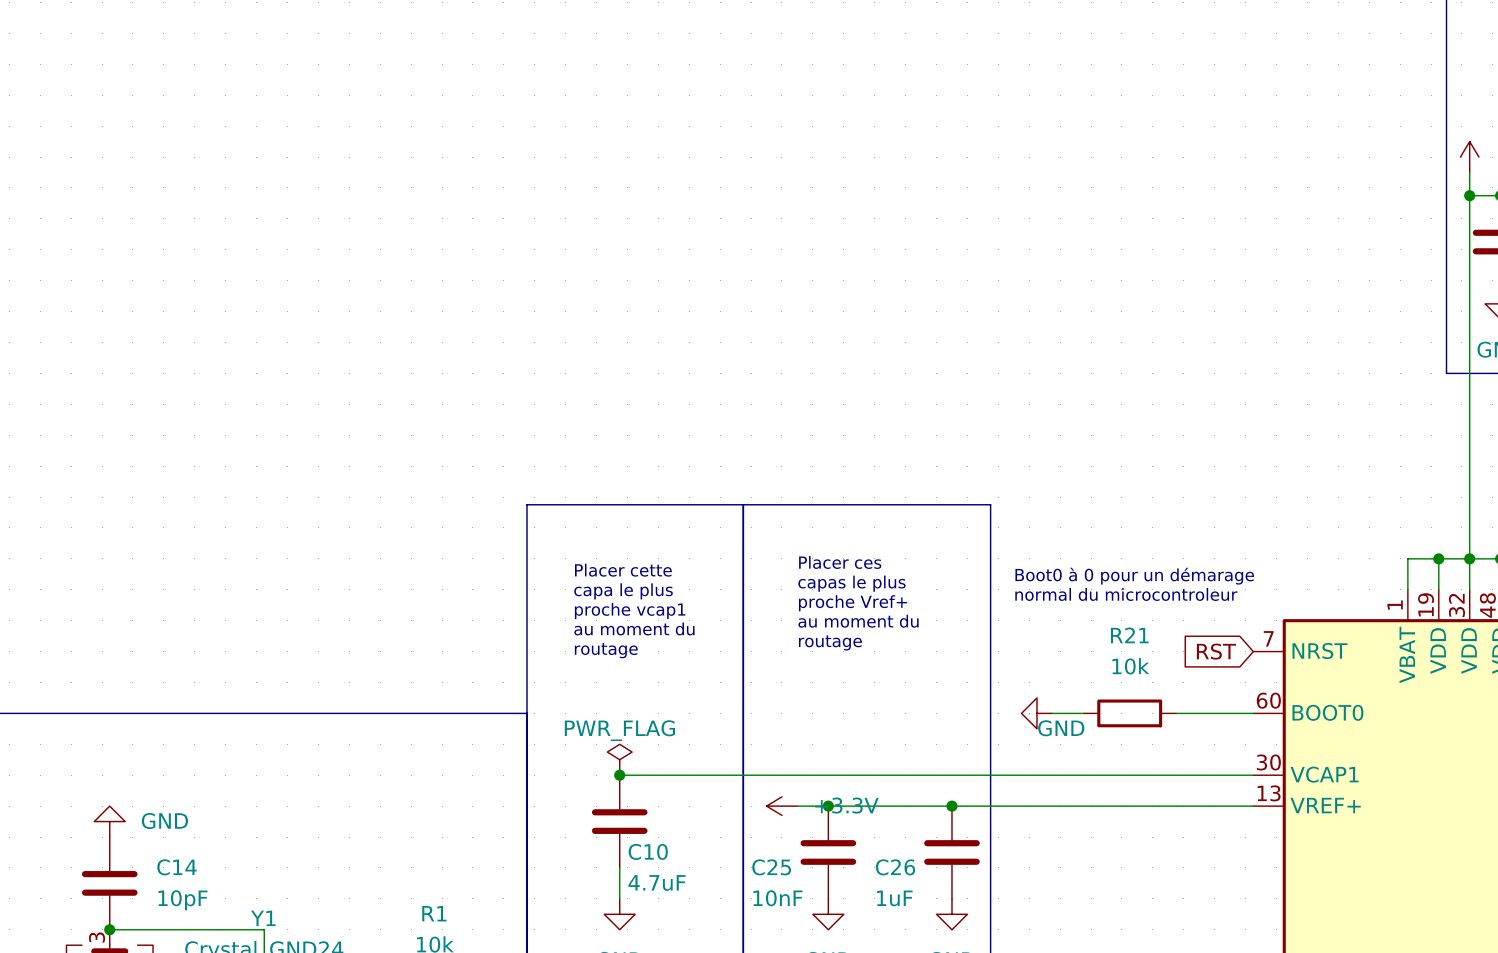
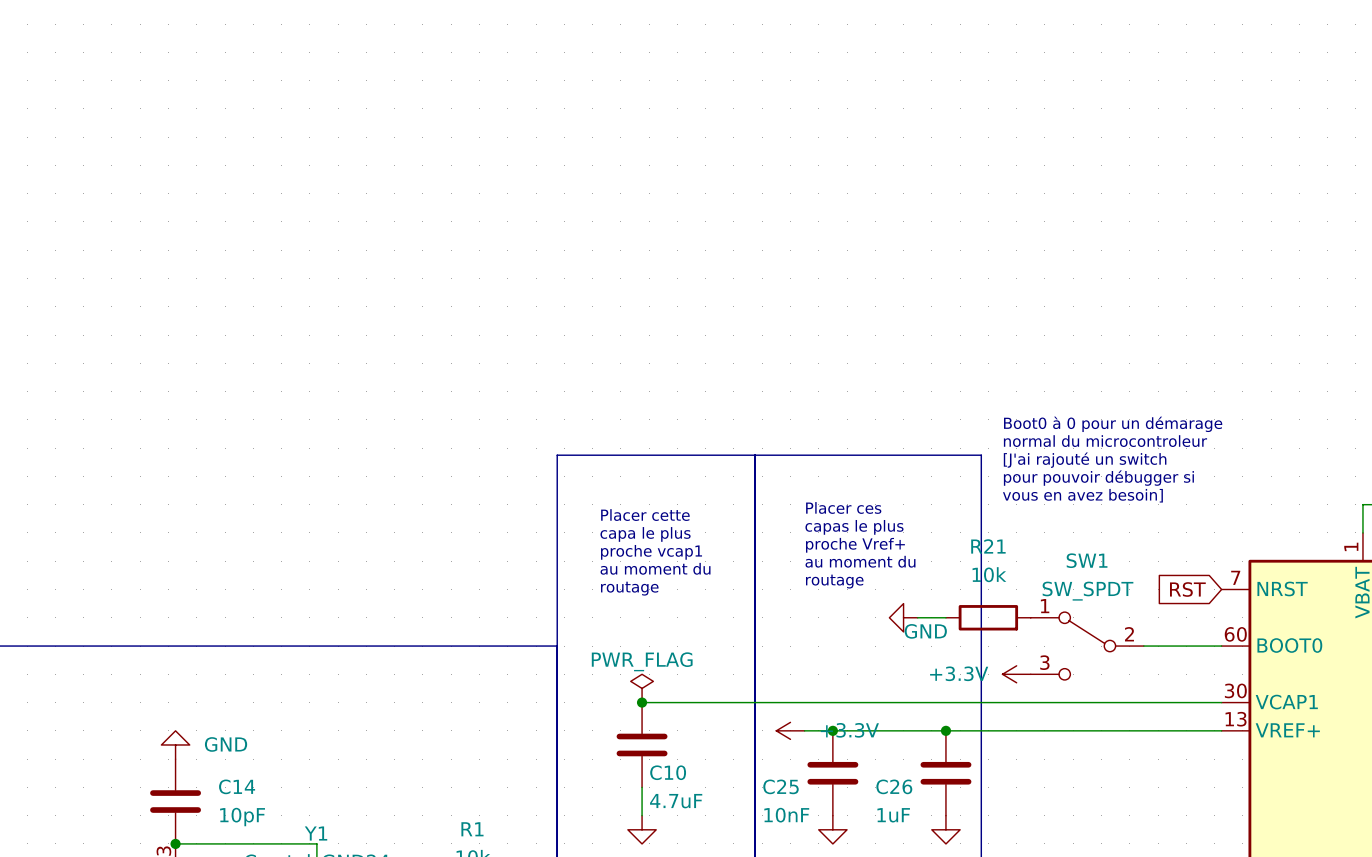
text: none -> [J'ai rajouté un switch (1085, 460)
text: none -> pour pouvoir débugger si (1098, 478)
text: none -> vous en avez besoin] (1082, 495)
text position: Boot0 à 0 pour un démarage (1134, 576) -> Boot0 à 0 pour un démarage (1113, 424)
text position: normal du microcontroleur (1126, 594) -> normal du microcontroleur (1105, 441)
power symbol position: GND (1036, 713) -> GND (903, 617)
wire: (1052, 713) (1083, 713) -> (917, 617) (945, 617)
SW1: none -> SW_SPDT (1087, 646)
R21 position: (1129, 713) -> (988, 617)
power symbol: none -> +3.3V (1016, 674)

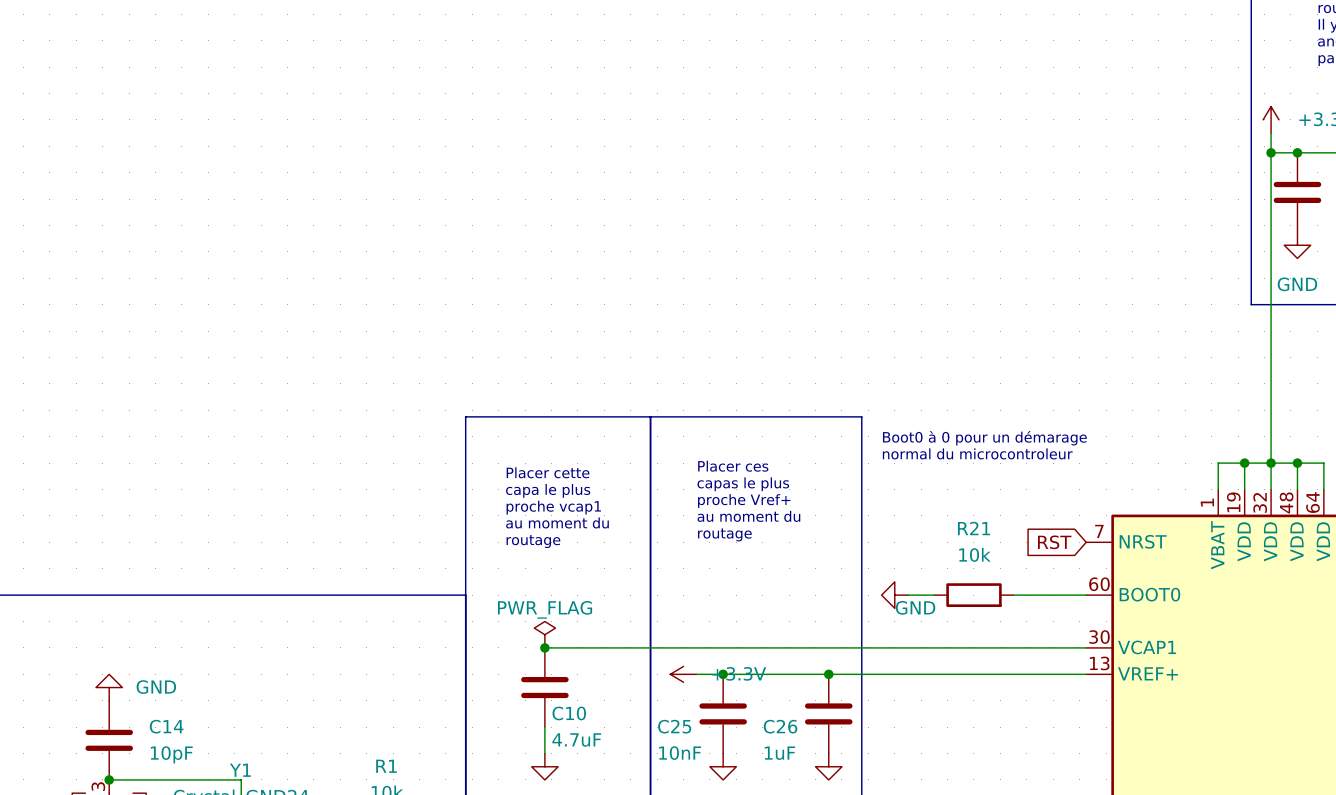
text: Boot0 à 0 pour un démarage (1113, 424) -> none
text: normal du microcontroleur (1105, 441) -> none
text: [J'ai rajouté un switch (1085, 460) -> none
text: pour pouvoir débugger si (1098, 478) -> Boot0 à 0 pour un démarage (984, 438)
text: vous en avez besoin] (1082, 495) -> normal du microcontroleur (977, 453)
power symbol position: GND (903, 617) -> GND (894, 595)
wire: (917, 617) (945, 617) -> (907, 595) (934, 595)
R21 position: (988, 617) -> (973, 595)
SW1: SW_SPDT (1087, 646) -> none
power symbol: +3.3V (1016, 674) -> none

